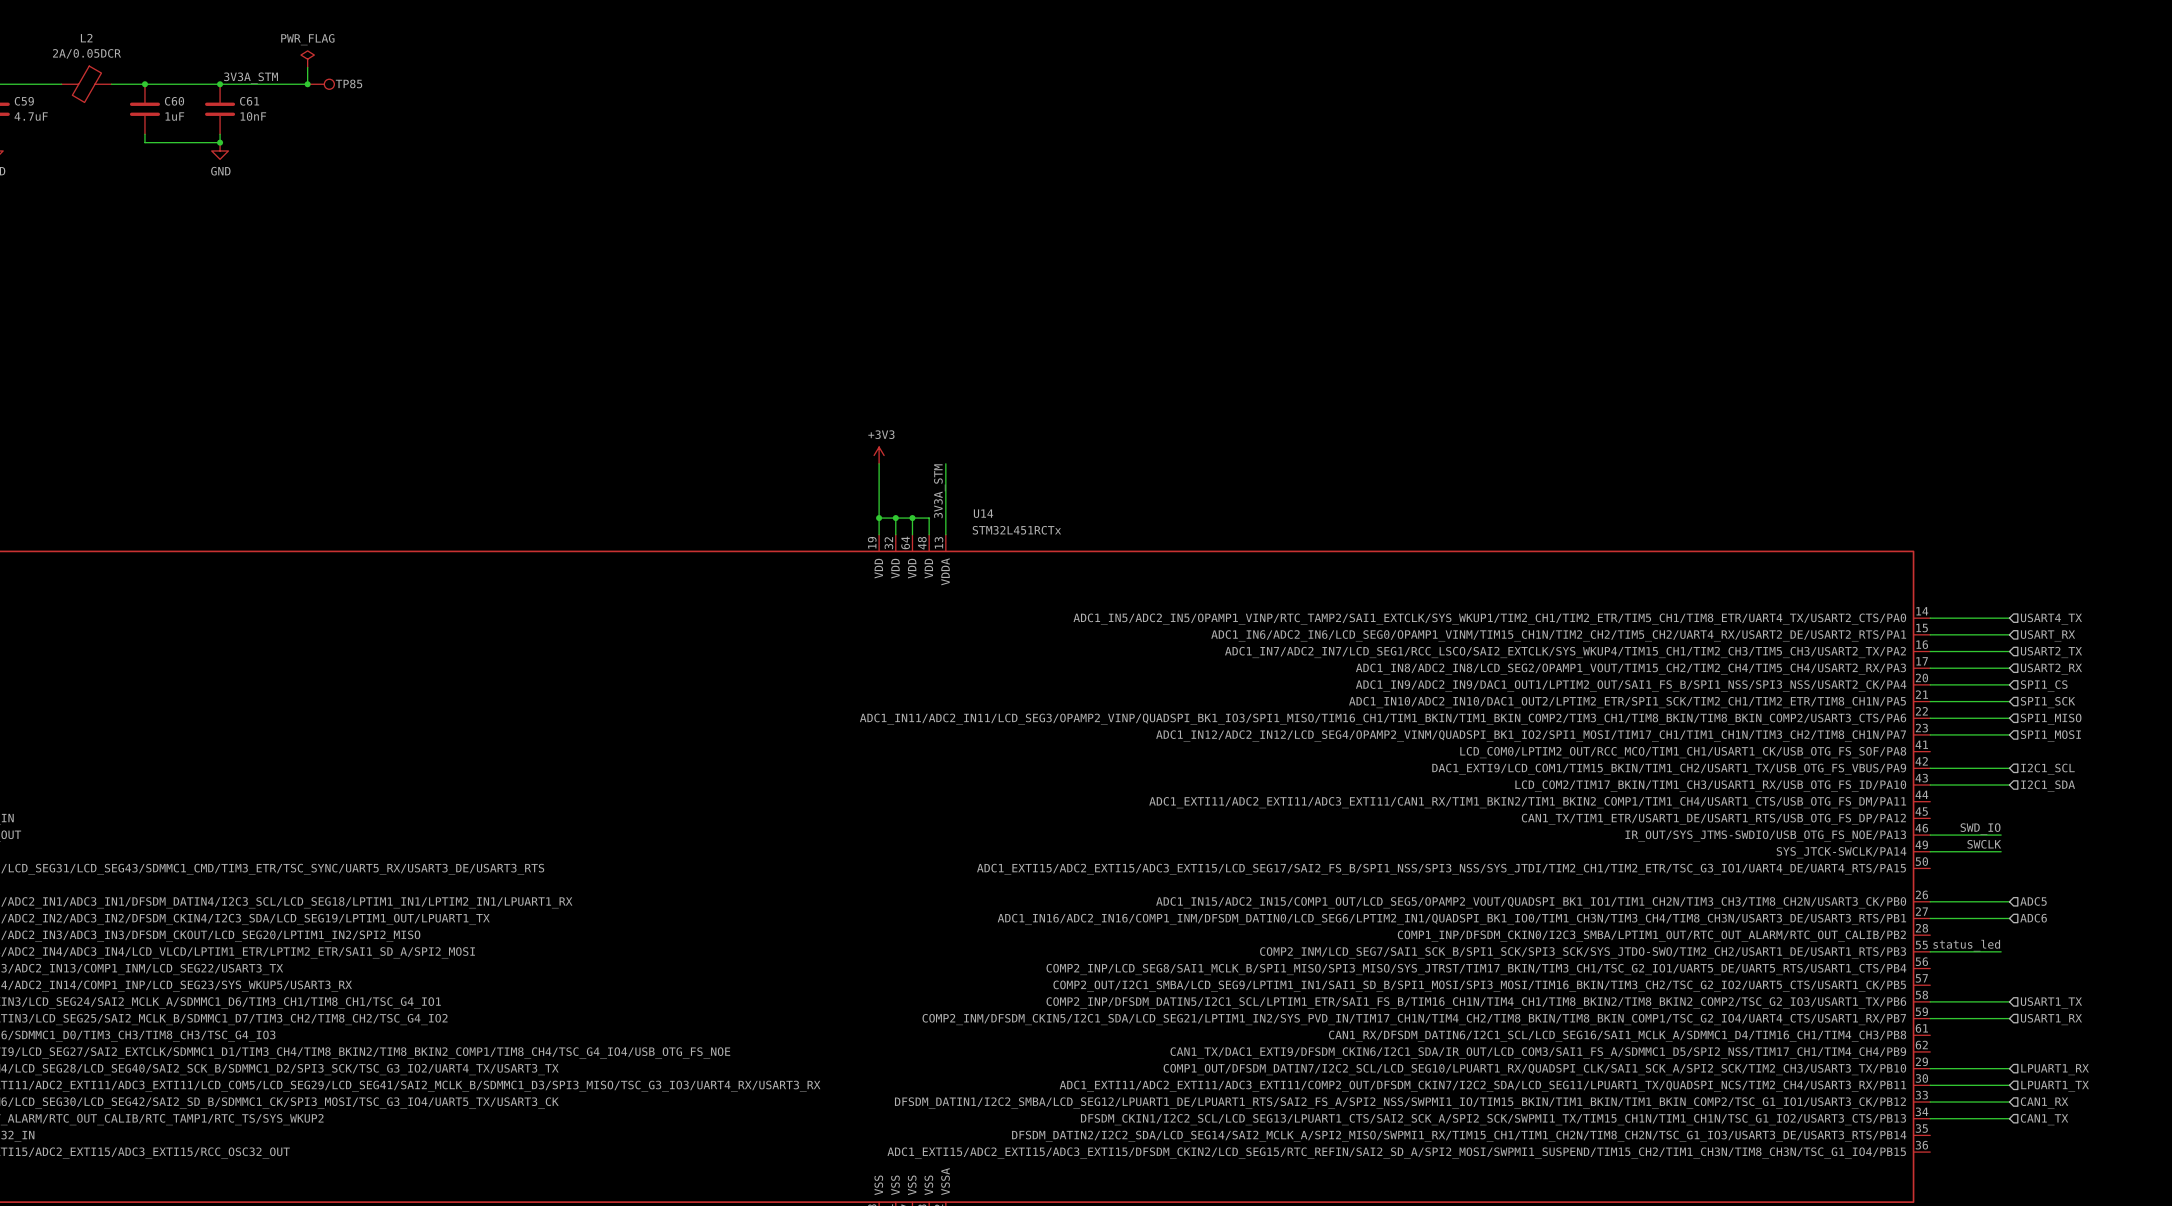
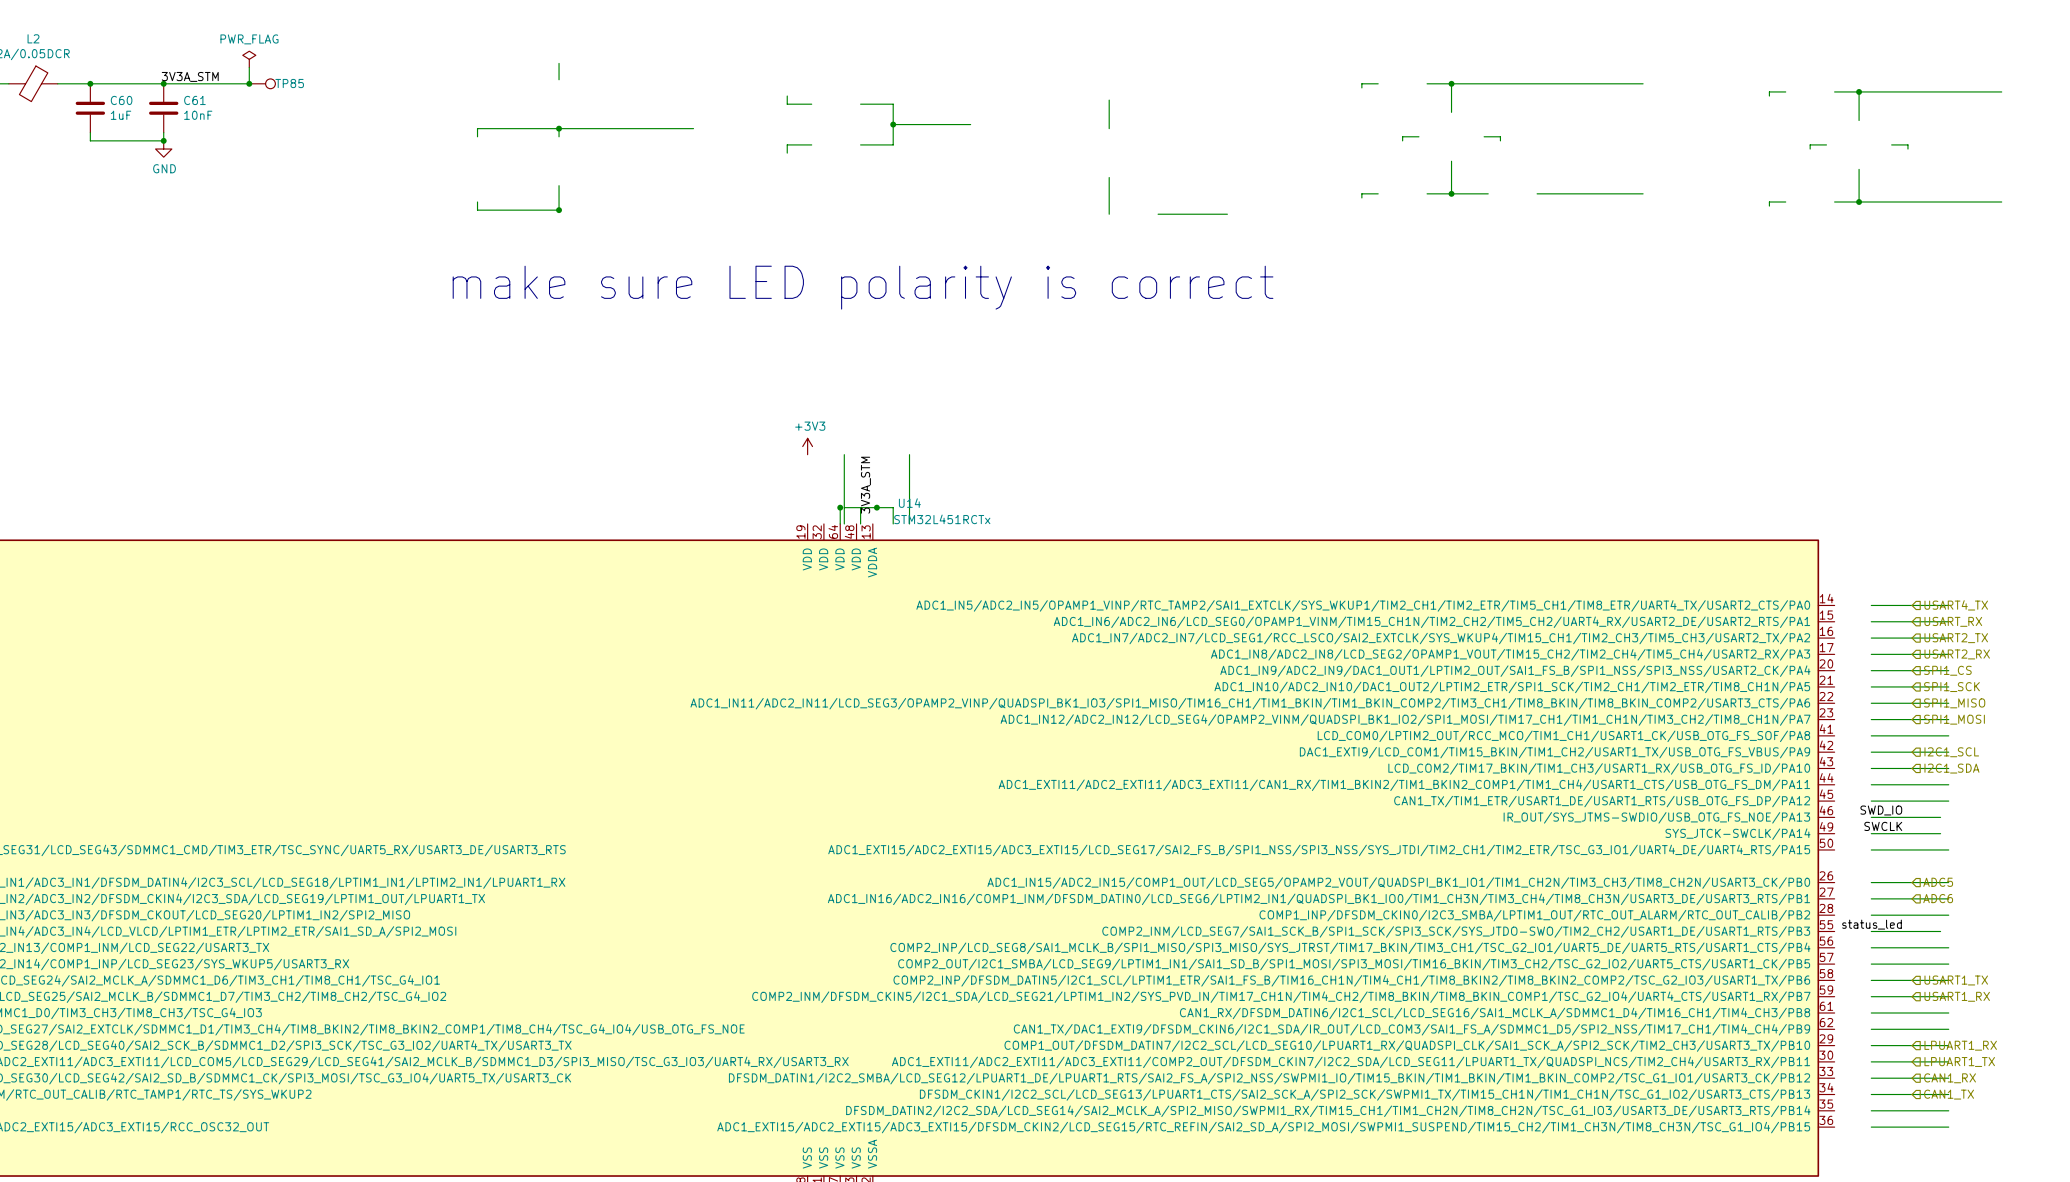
wire: none -> (559, 63) (559, 79)
wire: none -> (1378, 83) (1361, 83) (1361, 87)
wire: none -> (1427, 83) (1643, 83)
wire: none -> (1451, 83) (1451, 112)
junction: none -> (1451, 83)
wire: none -> (1785, 91) (1769, 91) (1769, 96)
wire: none -> (1834, 91) (2001, 91)
wire: none -> (1859, 91) (1859, 120)
junction: none -> (1859, 91)
wire: none -> (787, 96) (787, 104) (811, 104)
wire: none -> (1109, 100) (1109, 128)
wire: none -> (860, 104) (893, 104) (893, 144) (860, 144)
wire: none -> (893, 124) (970, 124)
junction: none -> (893, 124)
wire: none -> (559, 128) (559, 136)
junction: none -> (559, 128)
wire: none -> (693, 128) (477, 128) (477, 136)
wire: none -> (1418, 136) (1402, 136) (1402, 140)
wire: none -> (1484, 136) (1500, 136) (1500, 140)
wire: none -> (811, 144) (787, 144) (787, 153)
wire: none -> (1826, 144) (1810, 144) (1810, 149)
wire: none -> (1891, 144) (1907, 144) (1907, 149)
wire: none -> (1451, 161) (1451, 193)
wire: none -> (1859, 169) (1859, 201)
wire: none -> (1109, 177) (1109, 214)
wire: none -> (559, 185) (559, 210) (477, 210) (477, 201)
wire: none -> (1378, 193) (1361, 193) (1361, 197)
wire: none -> (1427, 193) (1488, 193)
junction: none -> (1451, 193)
wire: none -> (1537, 193) (1643, 193)
wire: none -> (1785, 201) (1769, 201) (1769, 206)
wire: none -> (1834, 201) (2001, 201)
junction: none -> (1859, 201)
junction: none -> (559, 210)
wire: none -> (1158, 214) (1227, 214)
text: none -> make sure LED polarity is correct (863, 287)
wire: (879, 463) (879, 534) -> (844, 454) (844, 523)
wire: (945, 463) (945, 534) -> (909, 454) (909, 523)
wire: (879, 518) (916, 518) -> none
junction: (879, 518) -> none
wire: (895, 518) (895, 534) -> (860, 507) (860, 523)
junction: (895, 518) -> none
wire: (929, 518) (929, 534) -> (856, 507) (893, 507) (893, 523)
junction: none -> (876, 507)
wire: (1930, 618) (1967, 618) -> (1912, 605) (1948, 605)
wire: (1930, 634) (1967, 634) -> (1912, 621) (1948, 621)
wire: (1930, 651) (1967, 651) -> (1912, 638) (1948, 638)
wire: (1930, 668) (1967, 668) -> (1912, 654) (1948, 654)
wire: (1930, 684) (1967, 684) -> (1912, 670) (1948, 670)
wire: (1930, 701) (1967, 701) -> (1912, 686) (1948, 686)
wire: (1930, 718) (1967, 718) -> (1912, 703) (1948, 703)
wire: (1930, 734) (1967, 734) -> (1912, 719) (1948, 719)
wire: none -> (1871, 735) (1948, 735)
wire: (1930, 768) (1967, 768) -> (1912, 752) (1948, 752)
wire: (1930, 785) (1967, 785) -> (1912, 768) (1948, 768)
wire: none -> (1871, 784) (1948, 784)
wire: none -> (1871, 801) (1948, 801)
wire: (1930, 835) (1967, 835) -> (1903, 817) (1940, 817)
wire: (1930, 851) (1967, 851) -> (1903, 833) (1940, 833)
wire: none -> (1871, 849) (1948, 849)
wire: (1930, 901) (1967, 901) -> (1912, 882) (1948, 882)
wire: (1930, 918) (1967, 918) -> (1912, 898) (1948, 898)
wire: none -> (1871, 915) (1948, 915)
wire: (1930, 951) (1967, 951) -> (1903, 931) (1940, 931)
wire: none -> (1871, 947) (1948, 947)
wire: none -> (1871, 964) (1948, 964)
wire: (1930, 1001) (1967, 1001) -> (1912, 980) (1948, 980)
wire: (1930, 1018) (1967, 1018) -> (1912, 996) (1948, 996)
wire: none -> (1871, 1012) (1948, 1012)
wire: none -> (1871, 1029) (1948, 1029)
wire: (1930, 1068) (1967, 1068) -> (1912, 1045) (1948, 1045)
wire: (1930, 1085) (1967, 1085) -> (1912, 1061) (1948, 1061)
wire: (1930, 1102) (1967, 1102) -> (1912, 1078) (1948, 1078)
wire: (1930, 1118) (1967, 1118) -> (1912, 1094) (1948, 1094)
wire: none -> (1871, 1110) (1948, 1110)
wire: none -> (1871, 1127) (1948, 1127)

